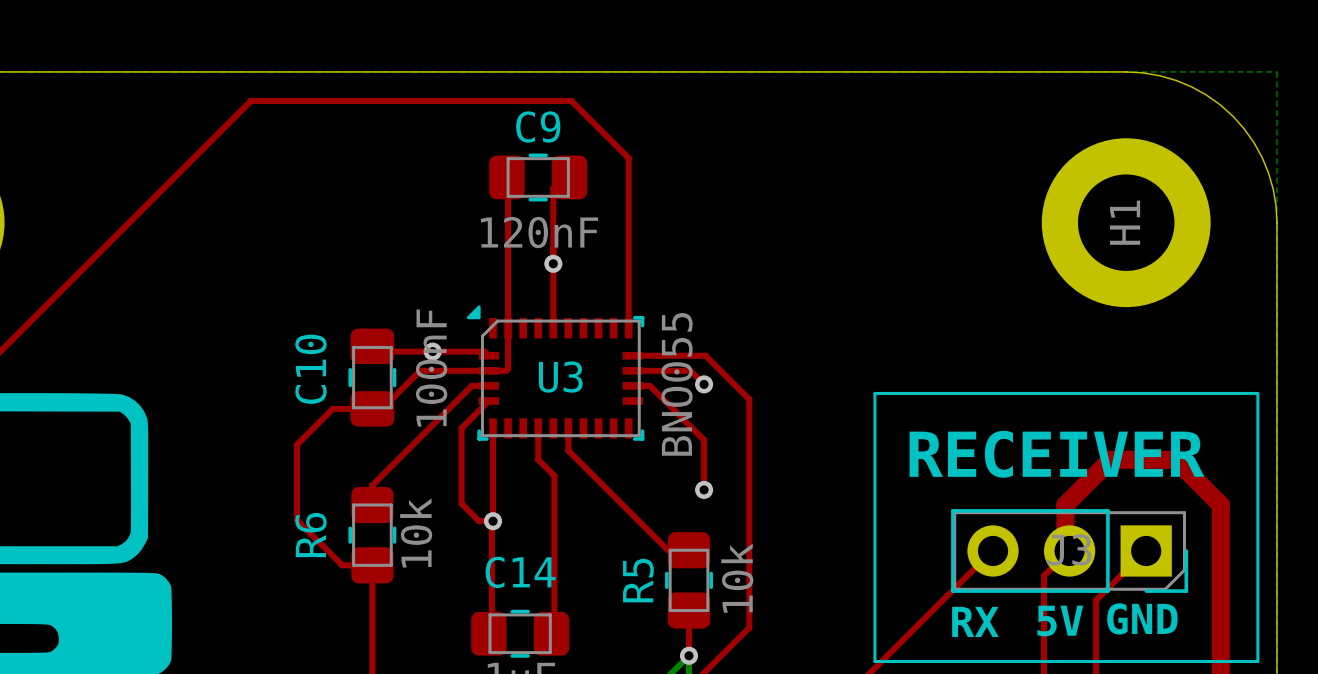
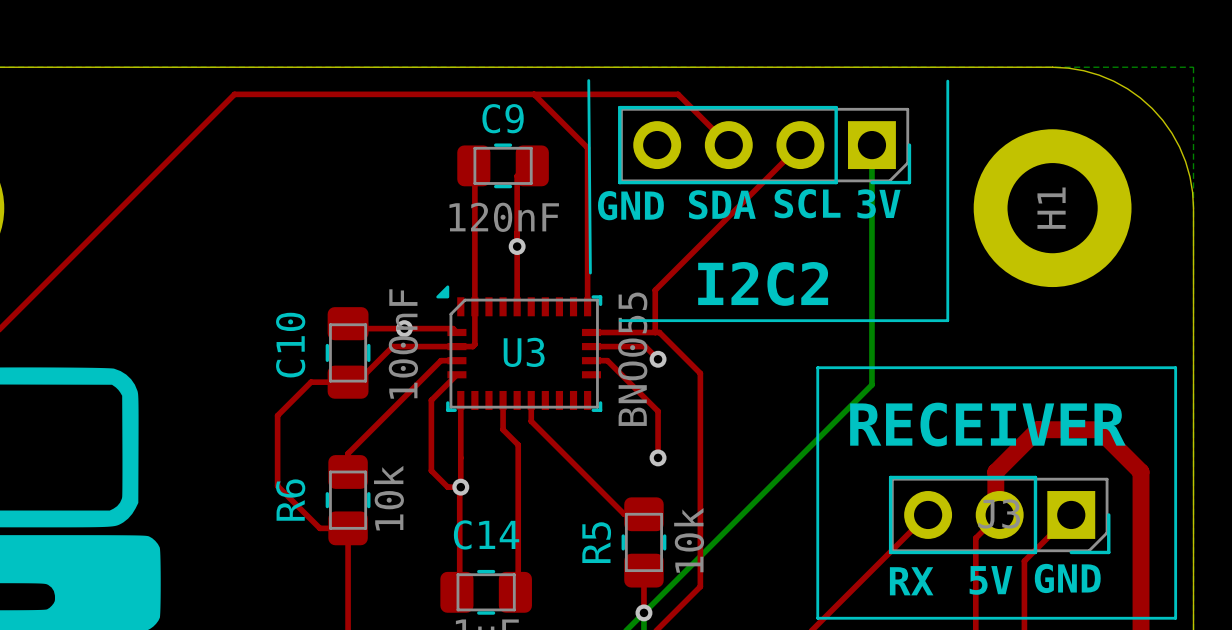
line: none -> (588, 80) (590, 273)
line: none -> (947, 81) (947, 320) (620, 320)
top track: none -> (534, 94) (678, 94) (728, 145)
part: none -> (764, 145)
top track: none -> (800, 145) (655, 290) (655, 332)
bottom track: none -> (871, 145) (871, 384) (643, 612)
text: none -> SCL (807, 203)
text: none -> 3V (878, 203)
text: none -> SDA (722, 204)
text: none -> GND (630, 205)
text: none -> I2C2 (763, 283)

